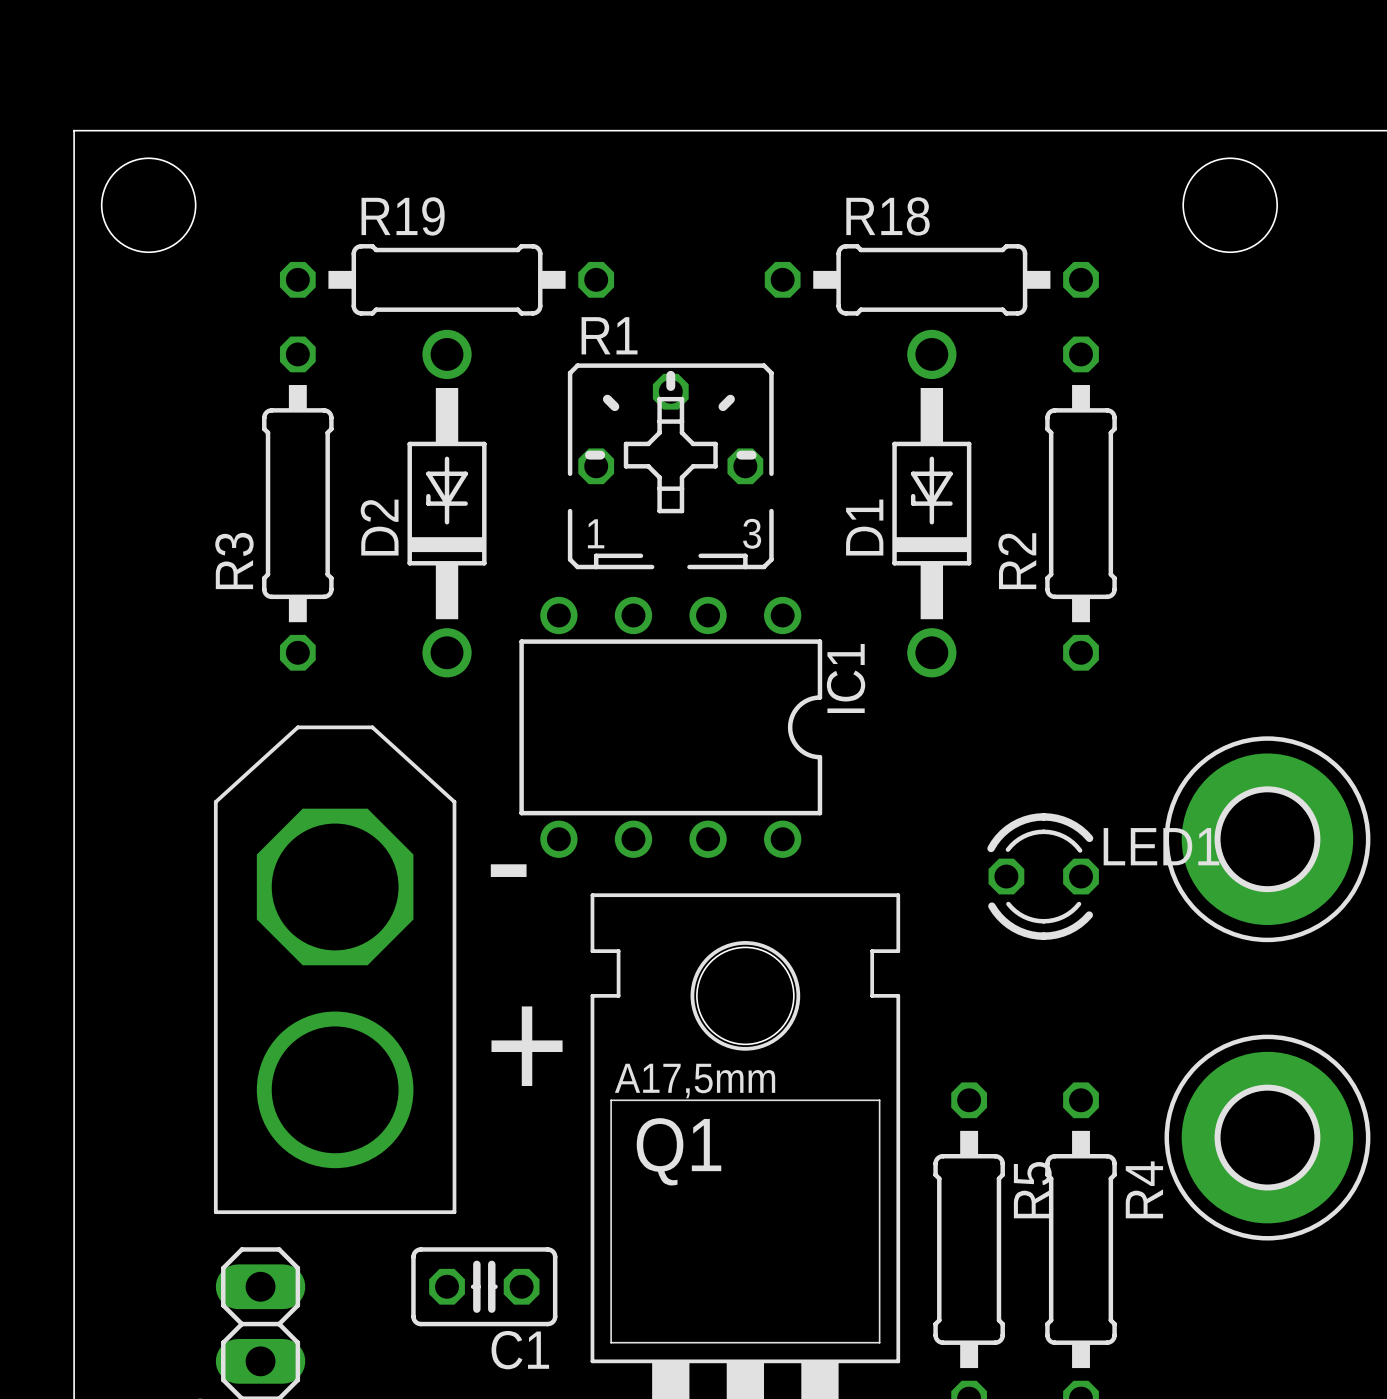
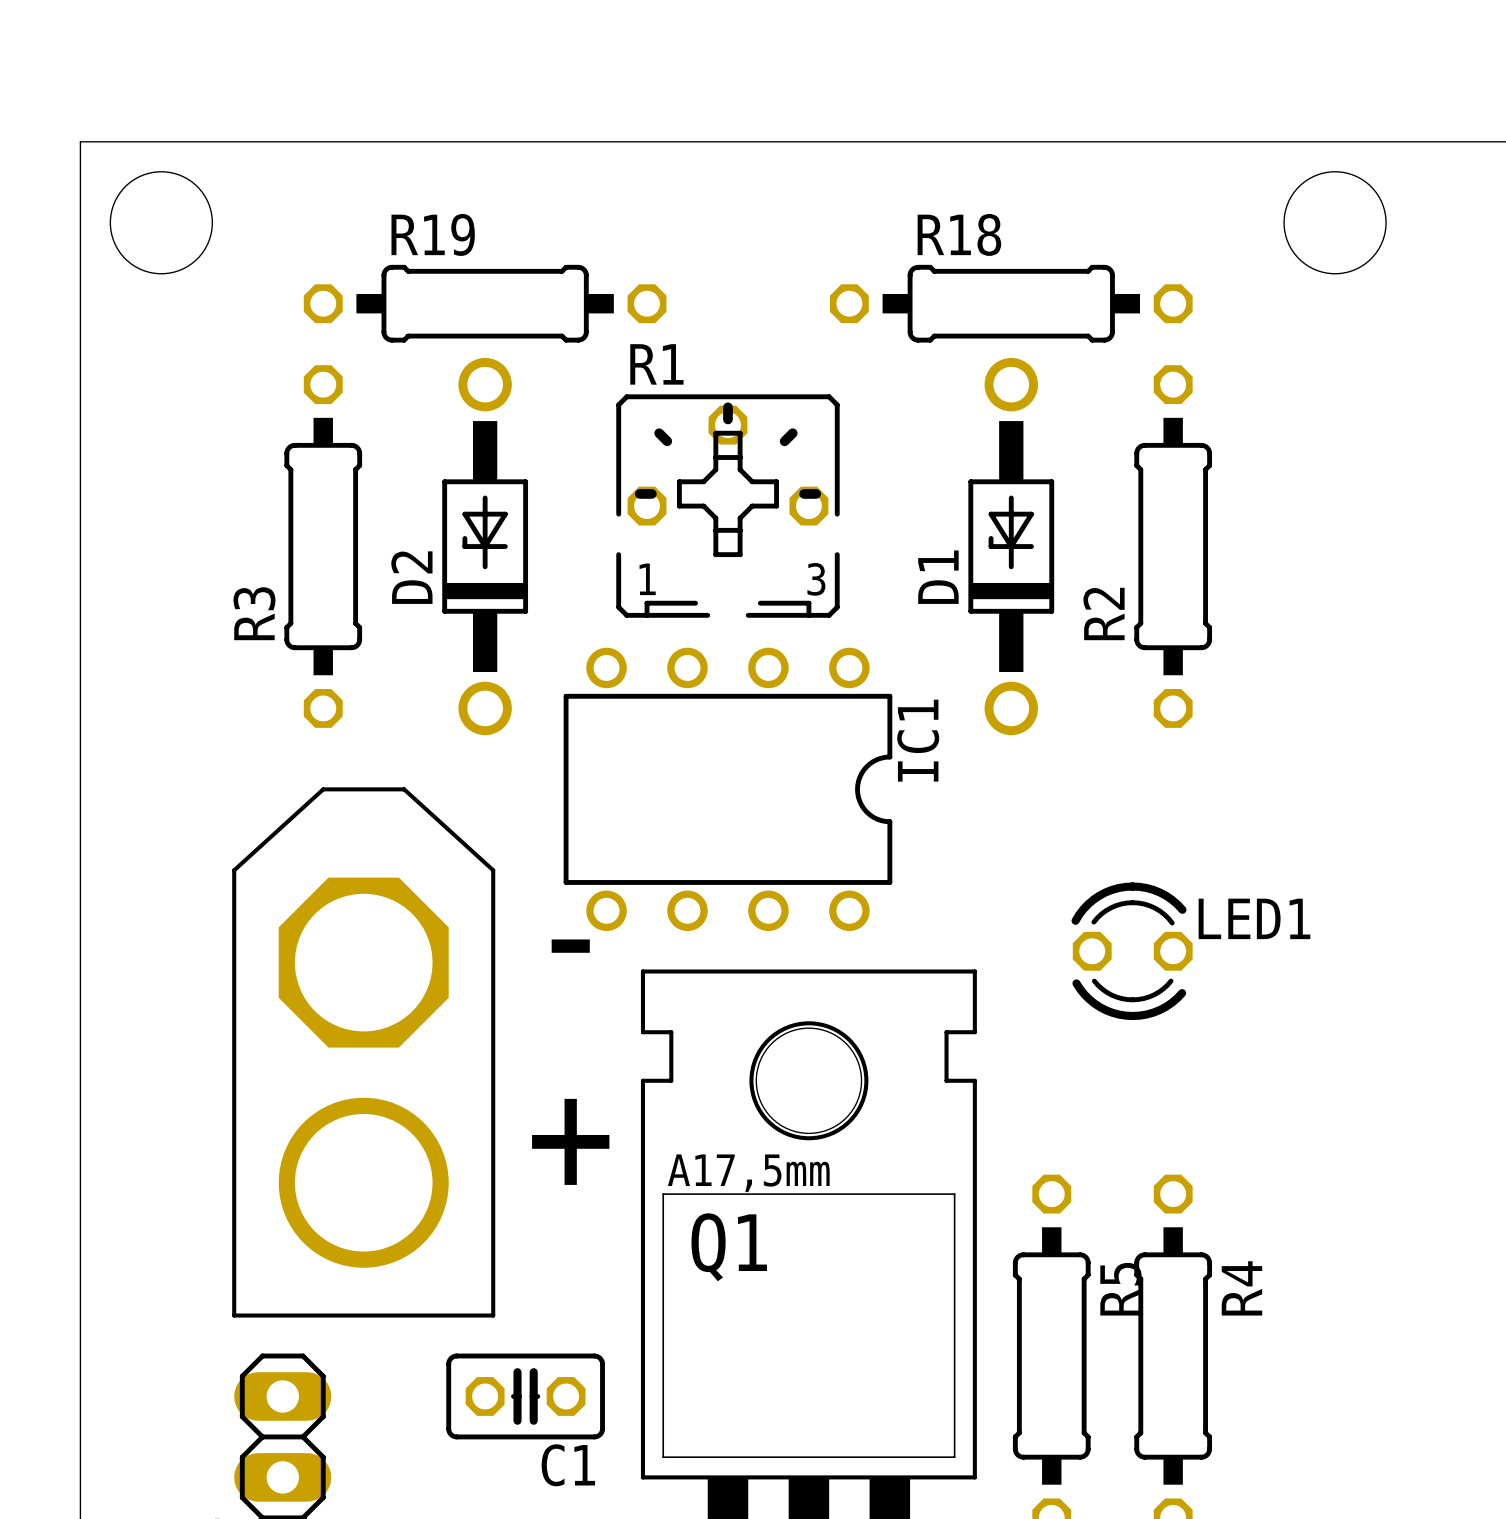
part: (1267, 839) -> none
part: (1267, 1137) -> none

